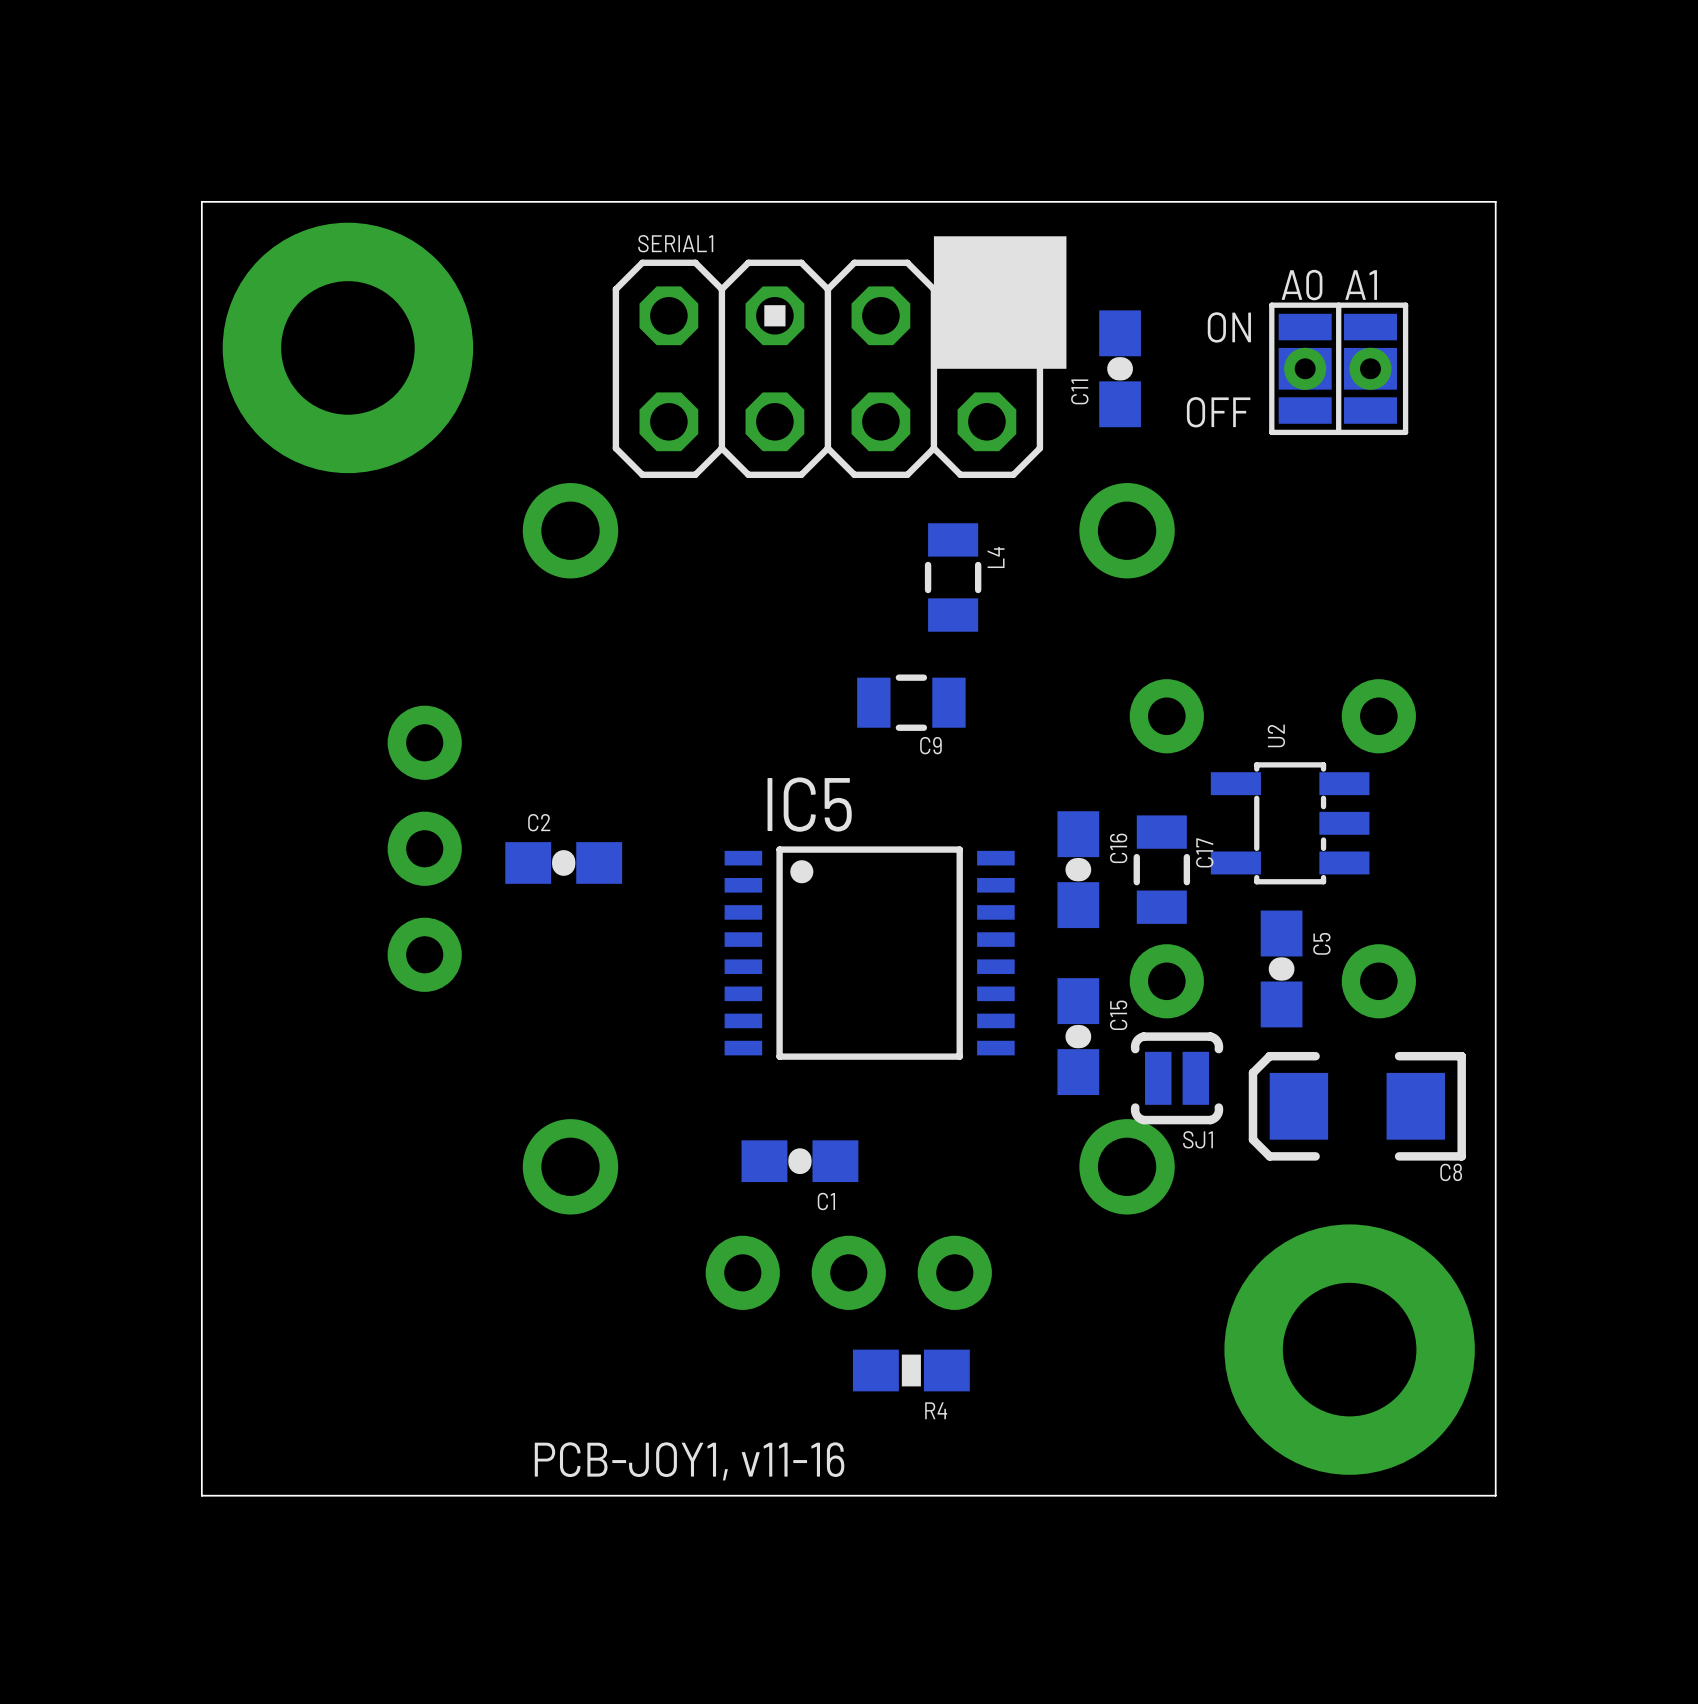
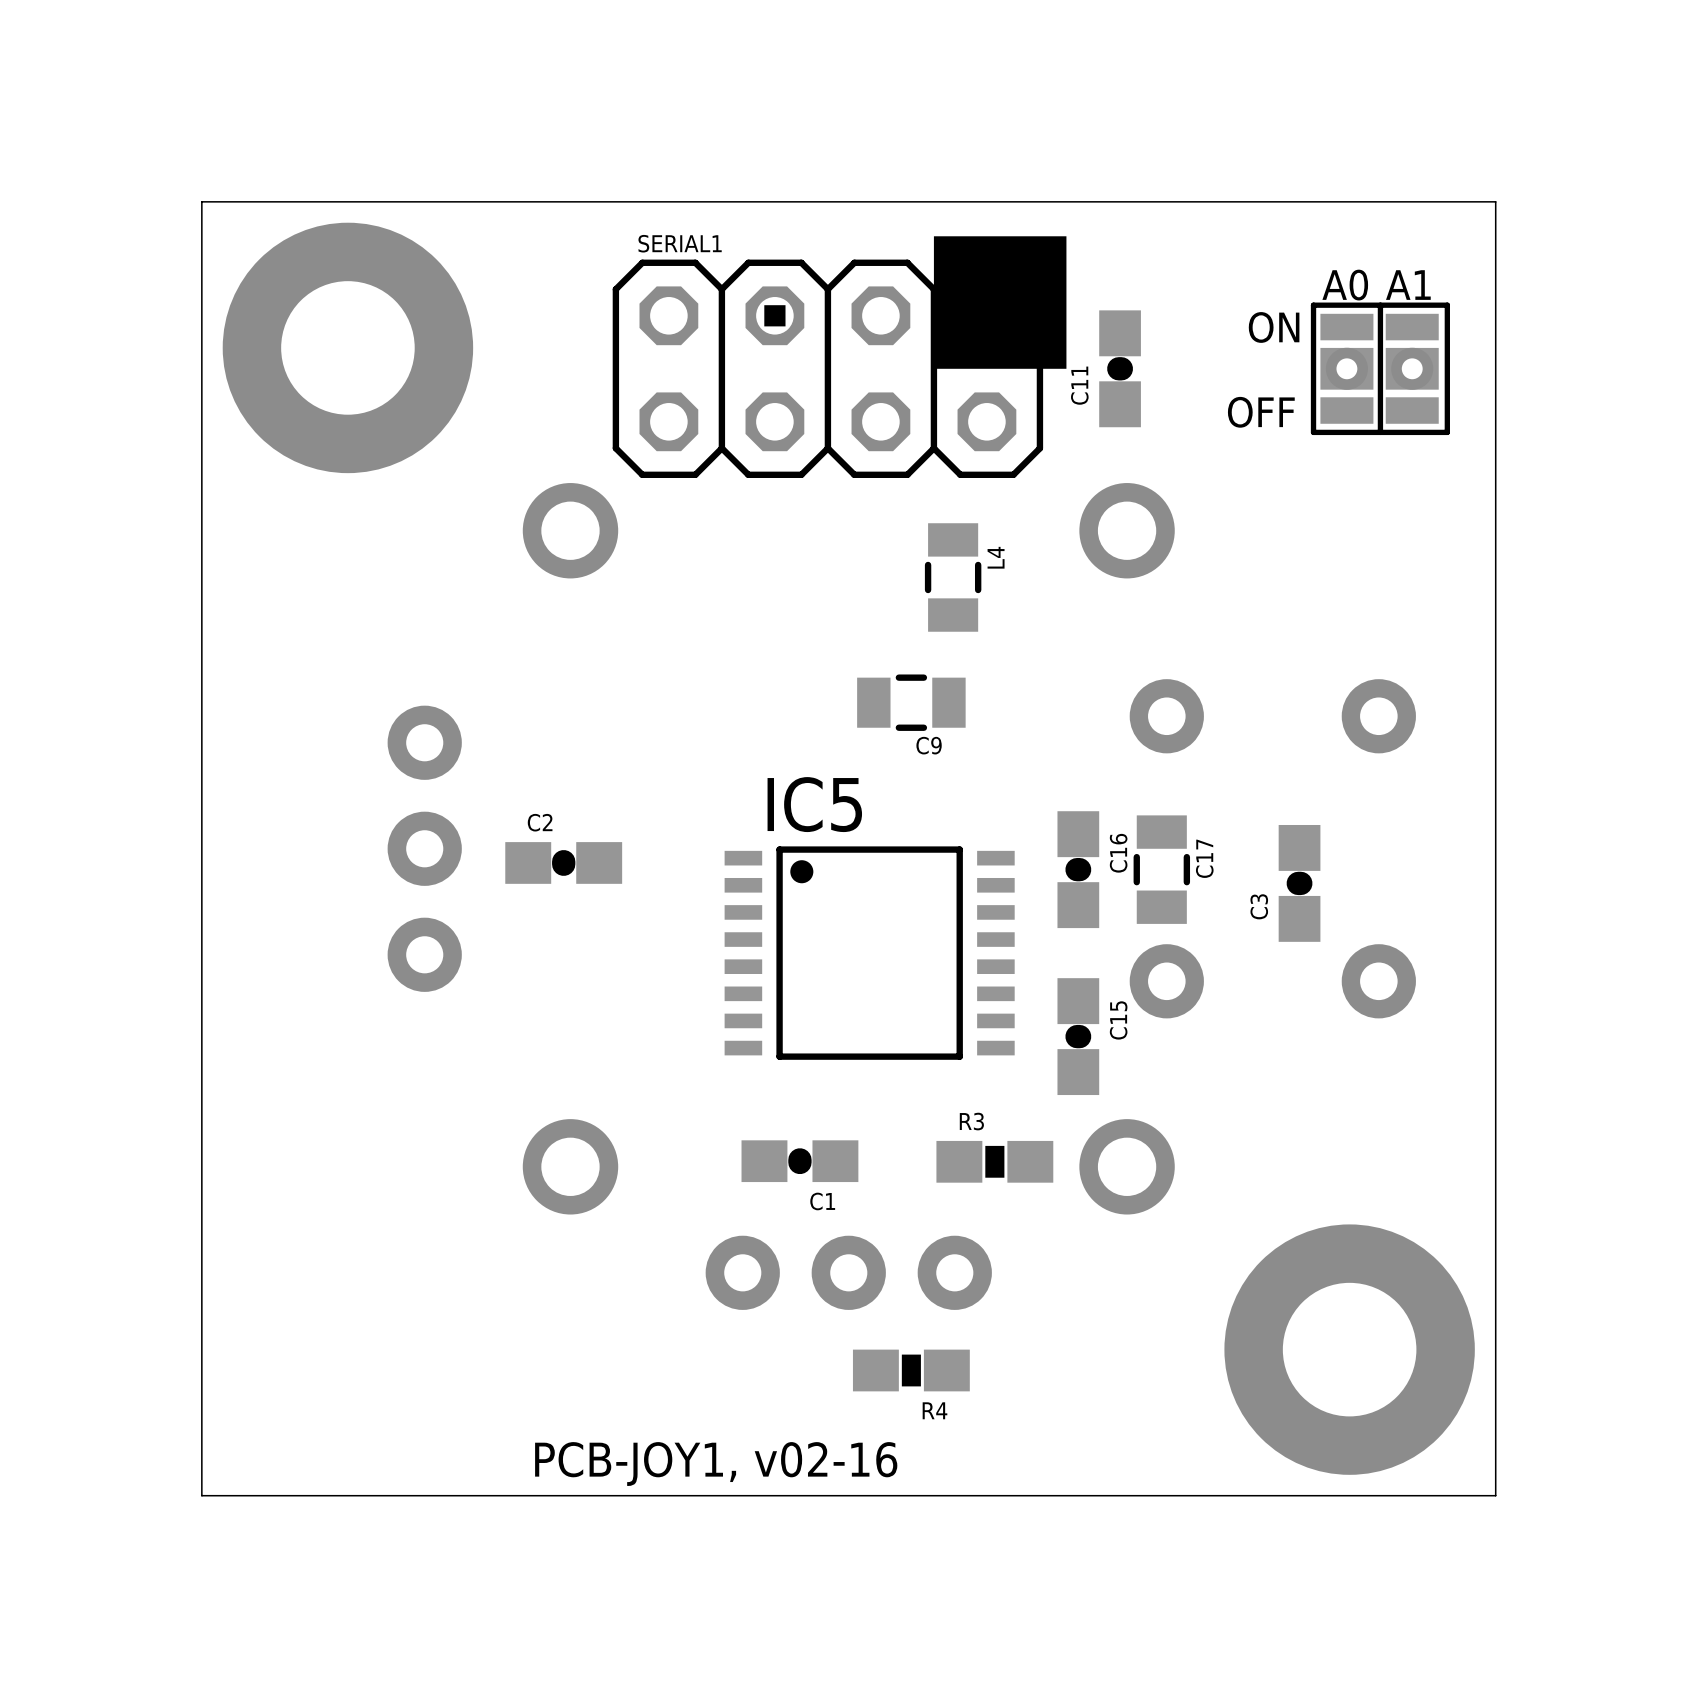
part position: (1338, 368) -> (1380, 368)
U2: (1290, 823) -> none
C3: none -> (1299, 883)
C5: (1281, 968) -> none
SJ1: (1177, 1078) -> none
C8: (1357, 1106) -> none
R3: none -> (994, 1161)
text: PCB-JOY1, v11-16 (689, 1461) -> PCB-JOY1, v02-16 (716, 1464)

